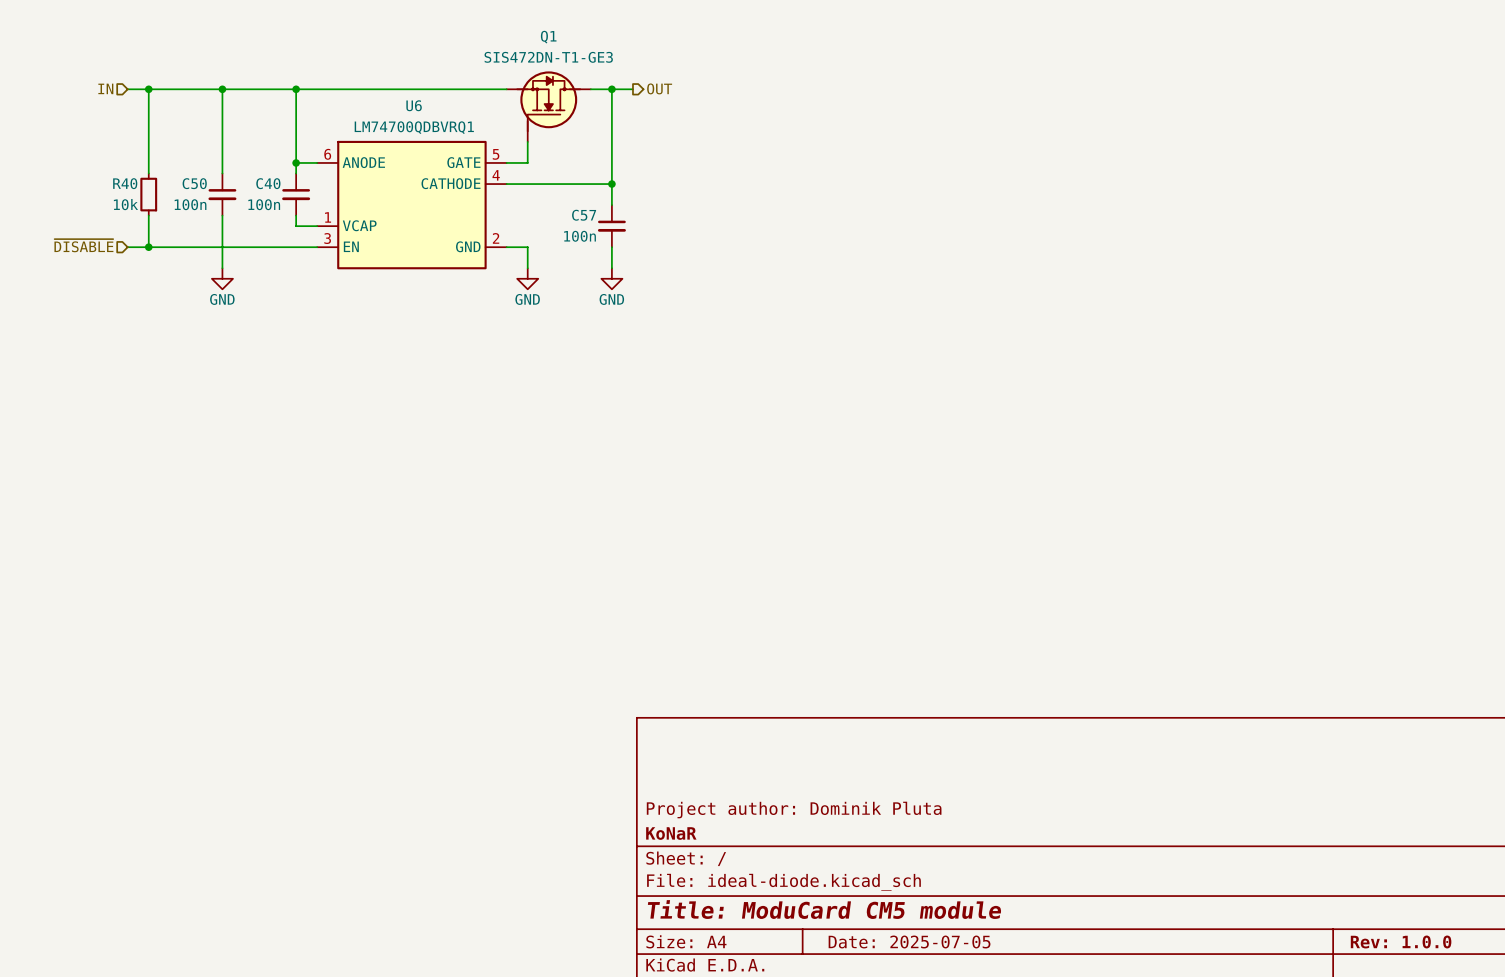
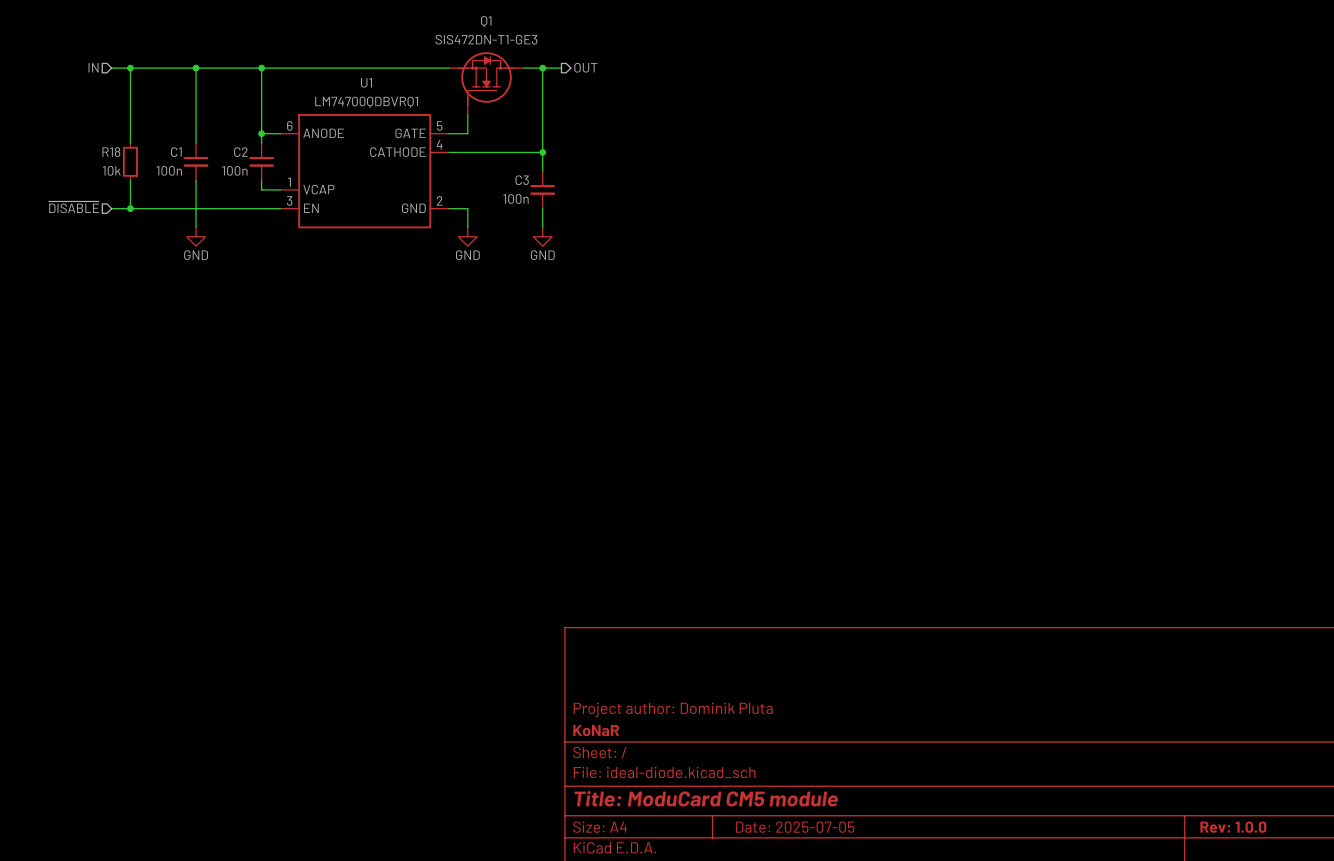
U6 name: U6 (414, 105) -> U1 (366, 82)
R40 name: R40 (125, 183) -> R18 (111, 152)
C50 name: C50 (194, 183) -> C1 (176, 152)
C40 name: C40 (268, 183) -> C2 (240, 152)
C57 name: C57 (584, 215) -> C3 (522, 180)

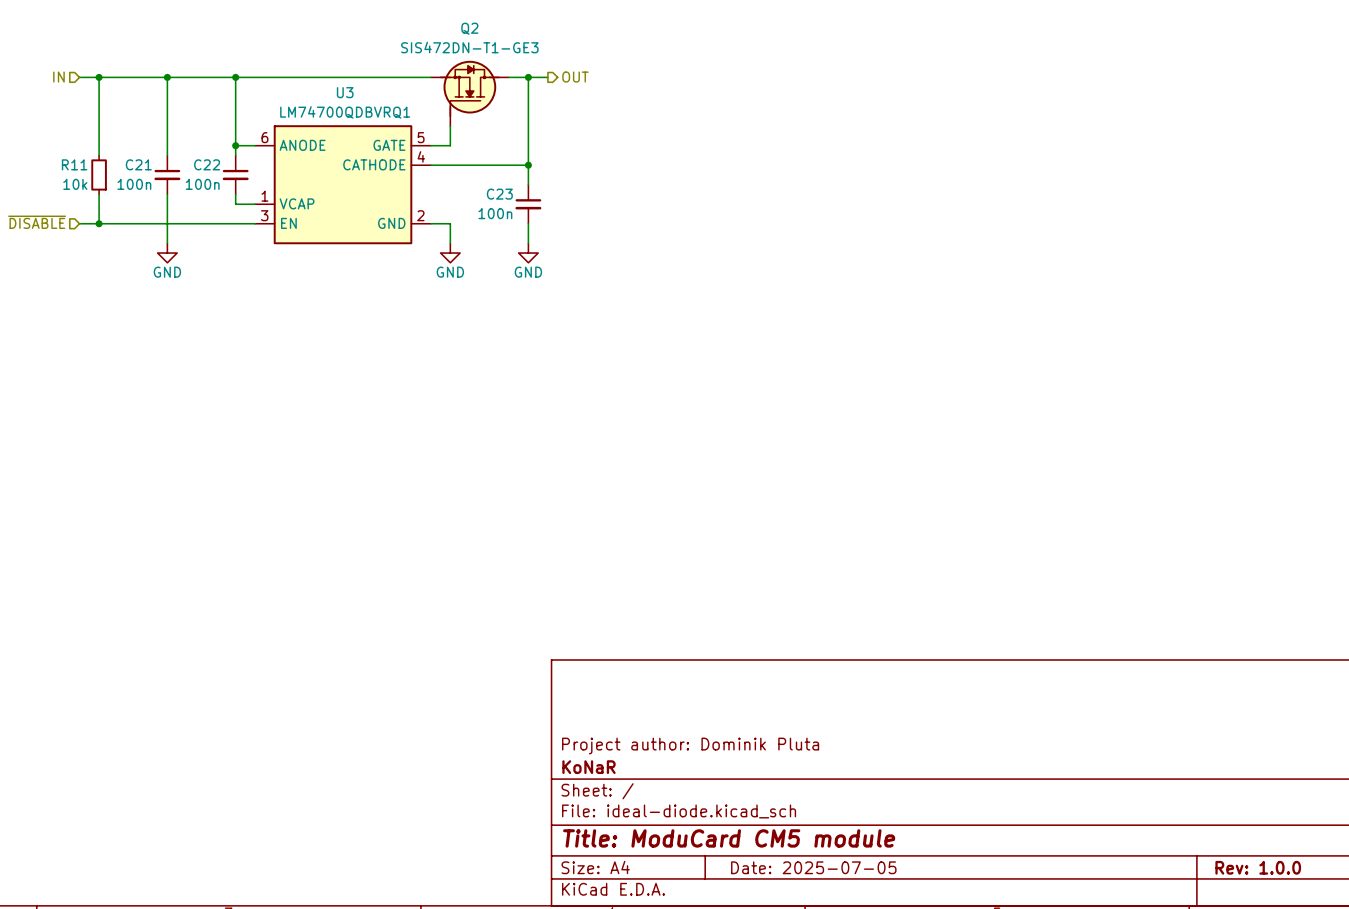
Q1 name: Q1 (486, 21) -> Q2 (469, 28)
U1 name: U1 (366, 82) -> U3 (345, 92)
R18 name: R18 (111, 152) -> R11 (74, 164)
C1 name: C1 (176, 152) -> C21 (138, 164)
C2 name: C2 (240, 152) -> C22 (207, 164)
C3 name: C3 (522, 180) -> C23 (499, 194)

